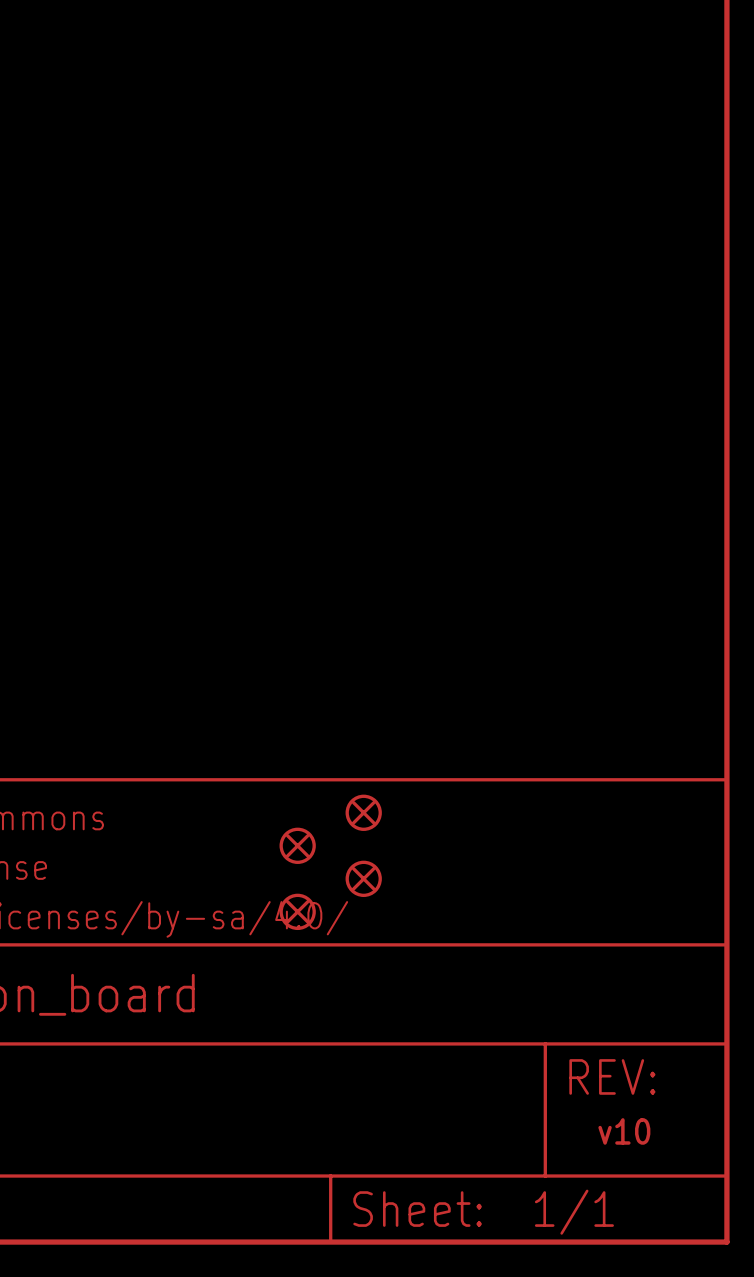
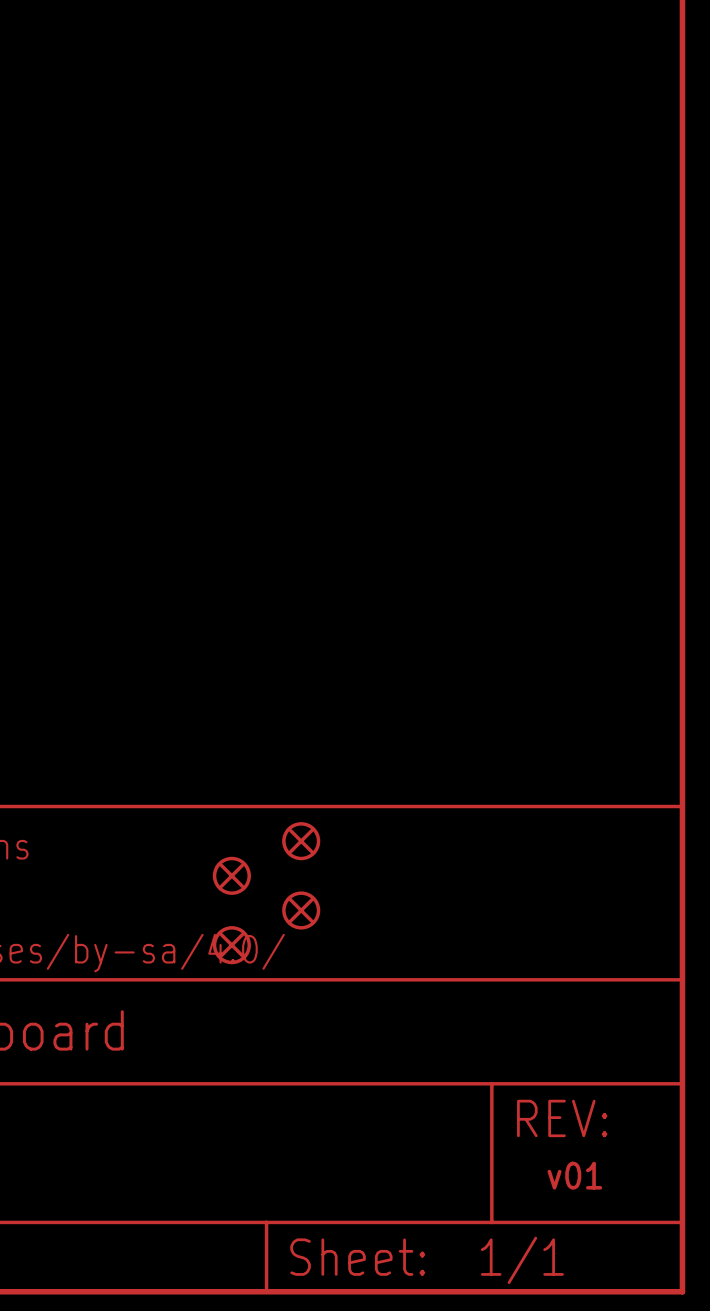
text: v10 (624, 1131) -> v01 (574, 1175)

